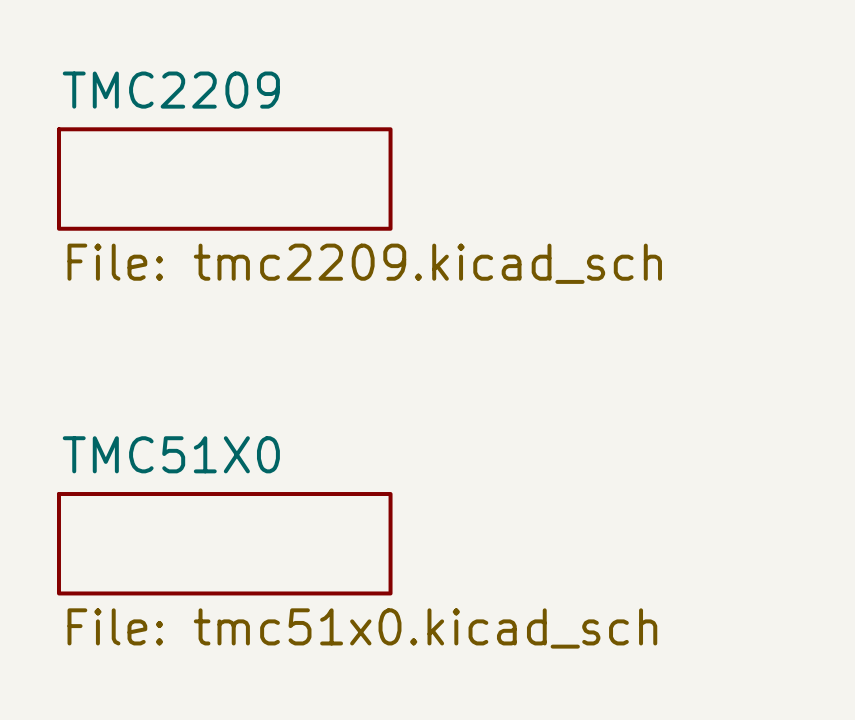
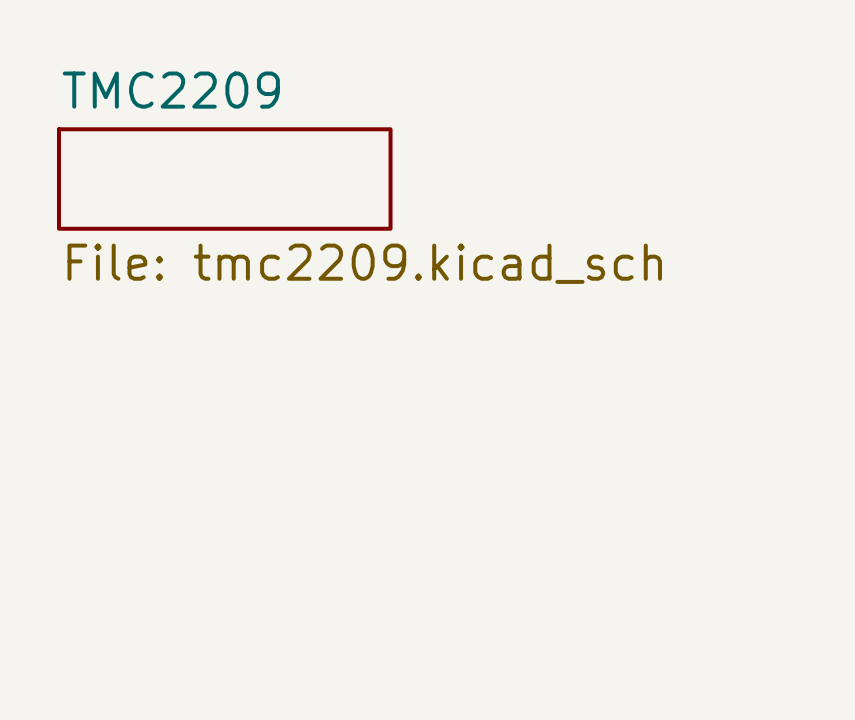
sheet TMC51X0: File: tmc51x0.kicad_sch (224, 543) -> none

